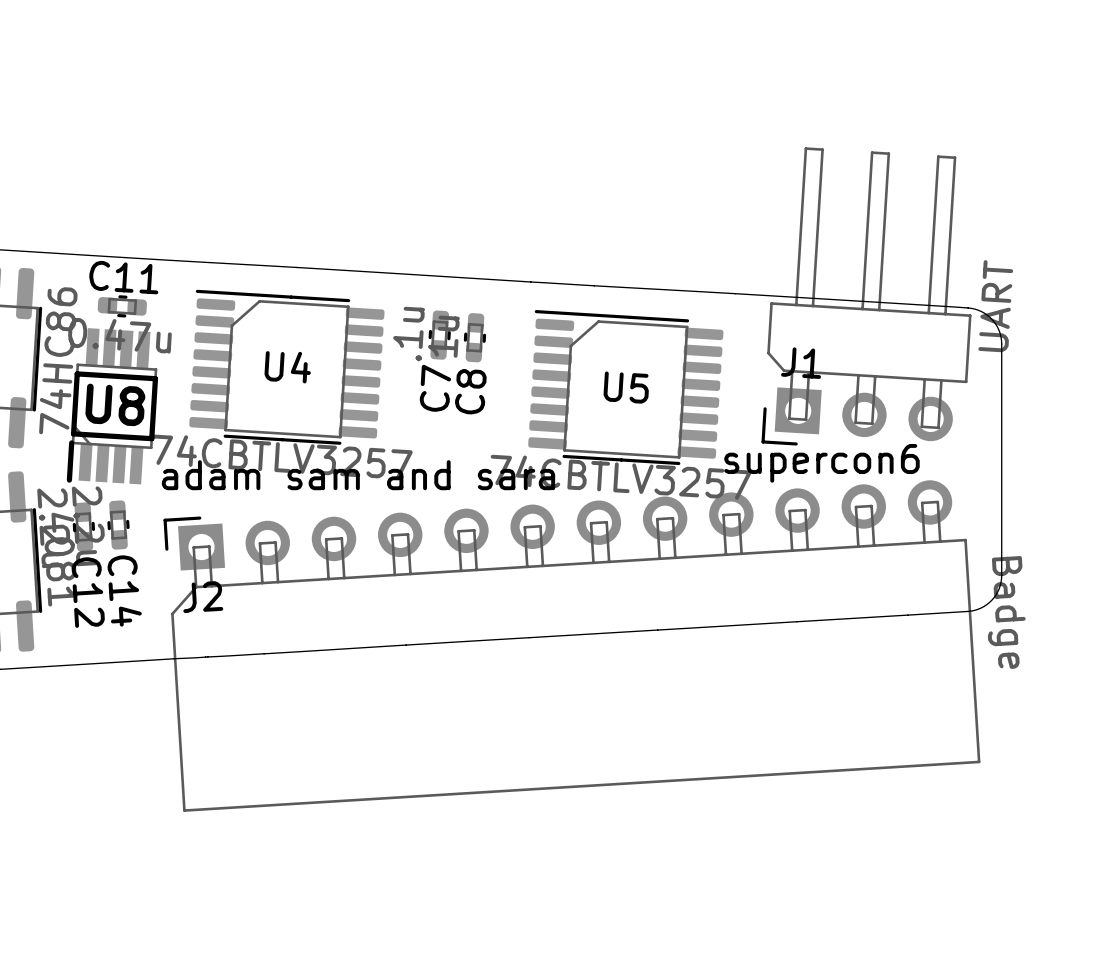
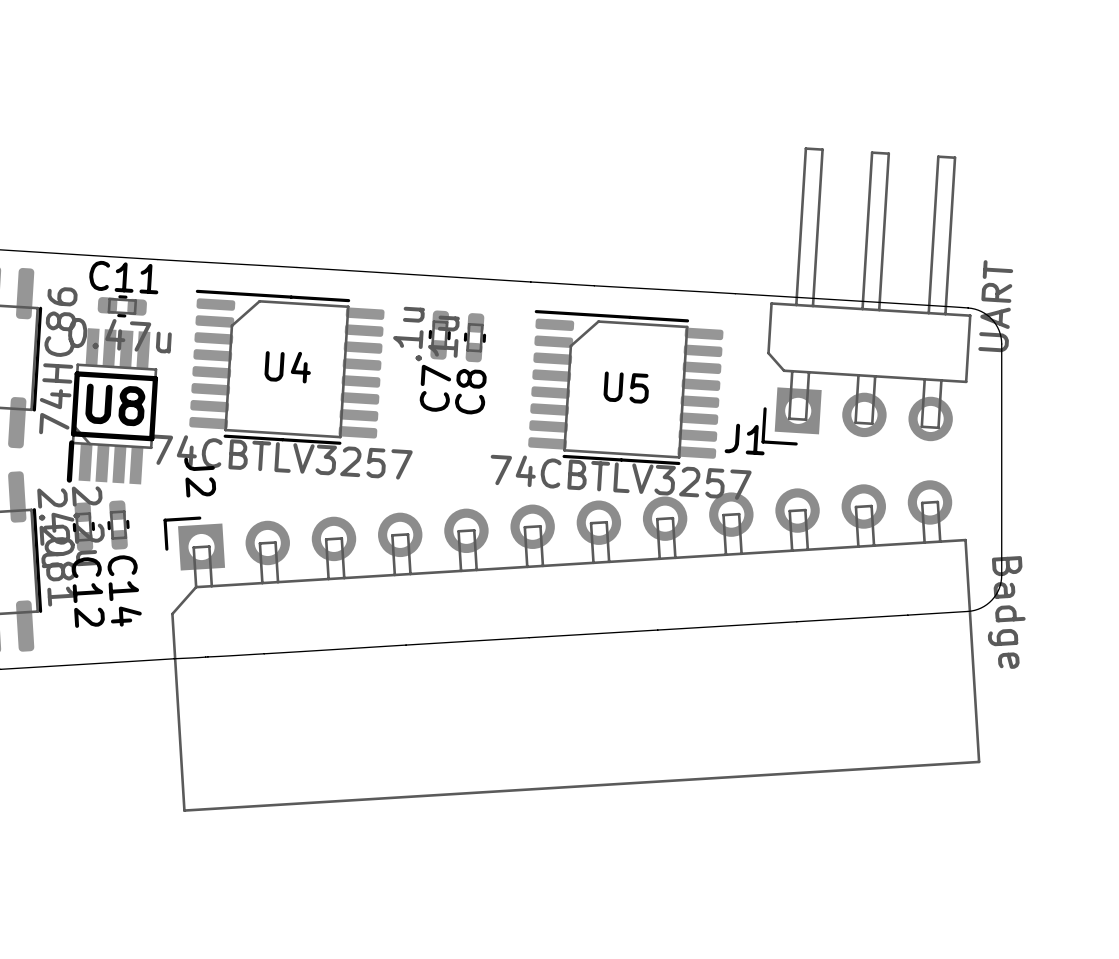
J1 name position: J1 (801, 363) -> J1 (744, 439)
text: supercon6 (821, 463) -> none
text: adam sam and sara (358, 475) -> none
J2 name rotation: 0° (203, 597) -> 90° clockwise (200, 477)
J2 name position: J2 (203, 597) -> J2 (200, 477)

